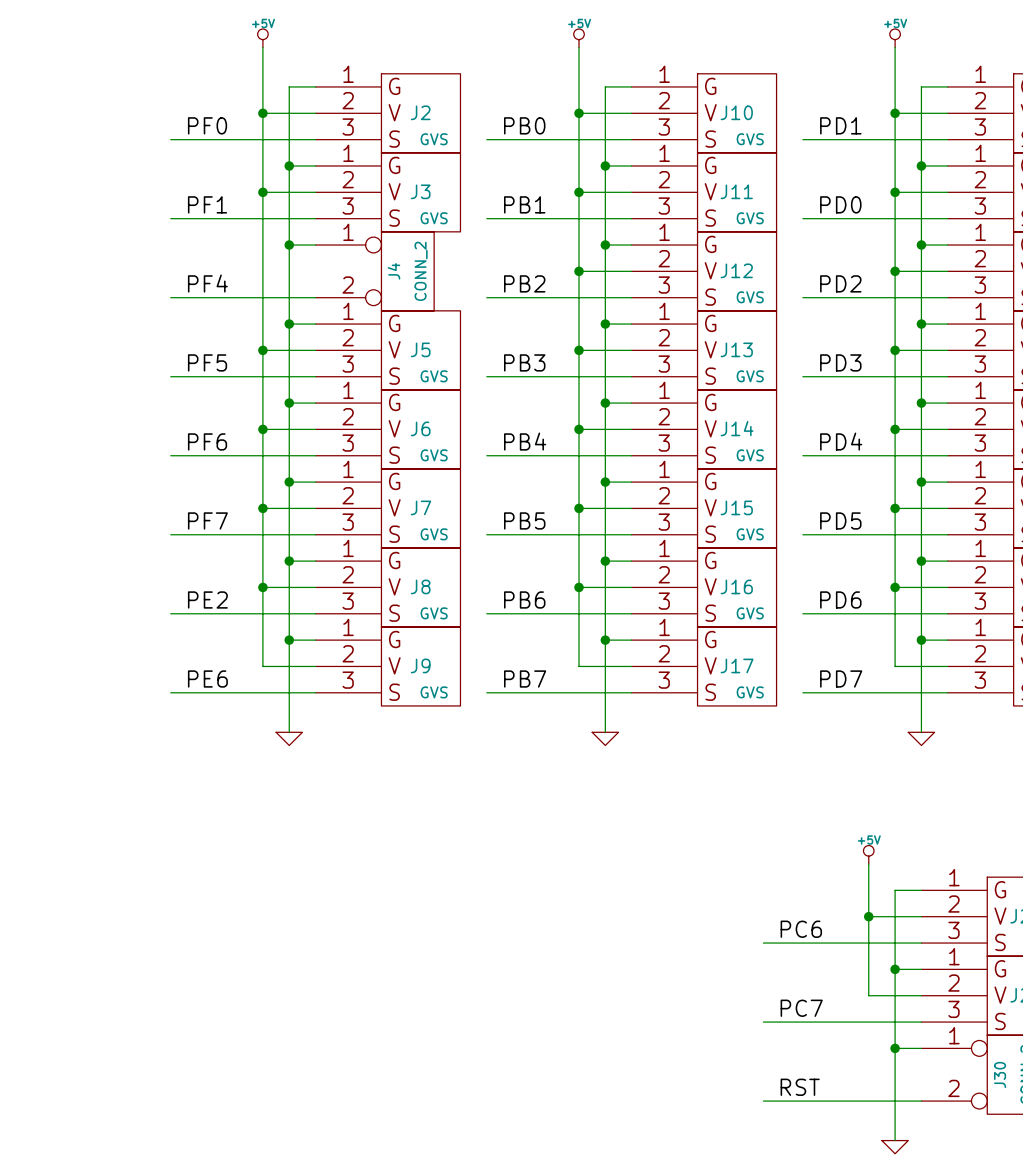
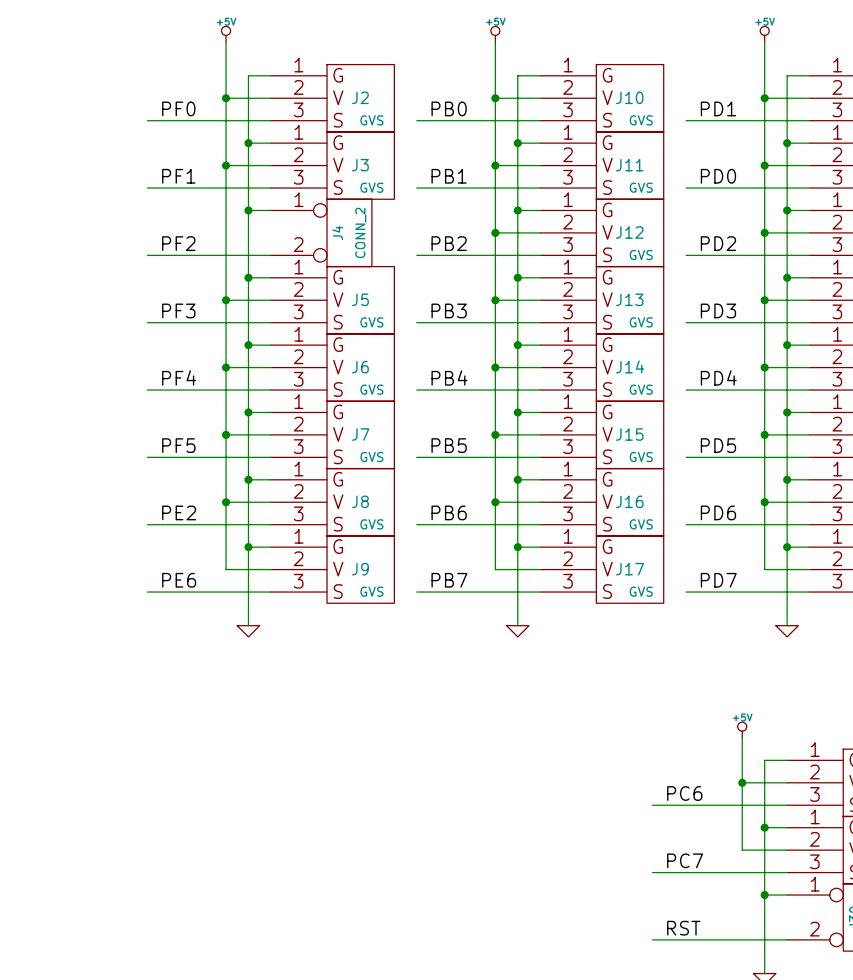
label: PF4 (207, 283) -> PF2 (178, 243)
label: PF5 (207, 362) -> PF3 (178, 310)
label: PF6 (207, 441) -> PF4 (179, 377)
label: PF7 (207, 520) -> PF5 (178, 445)

